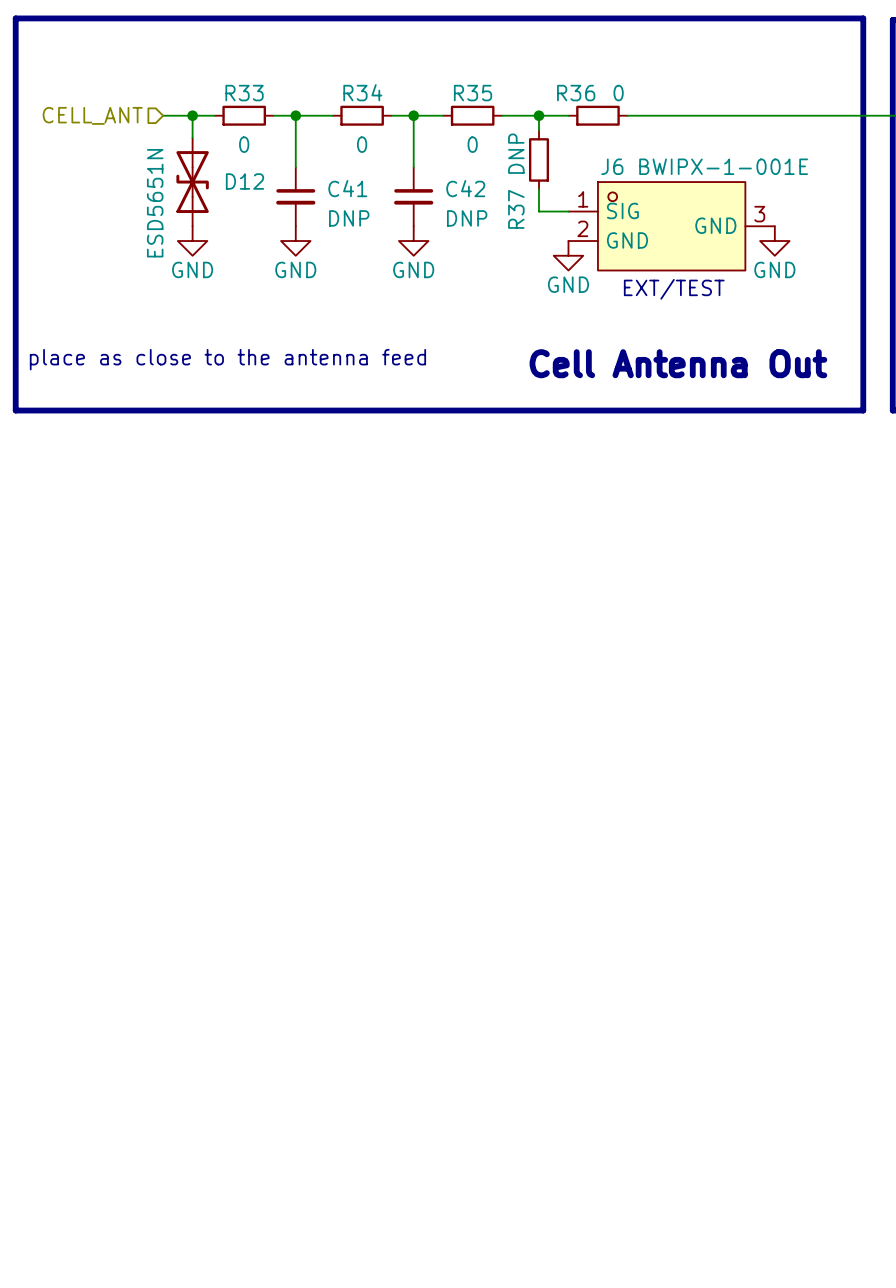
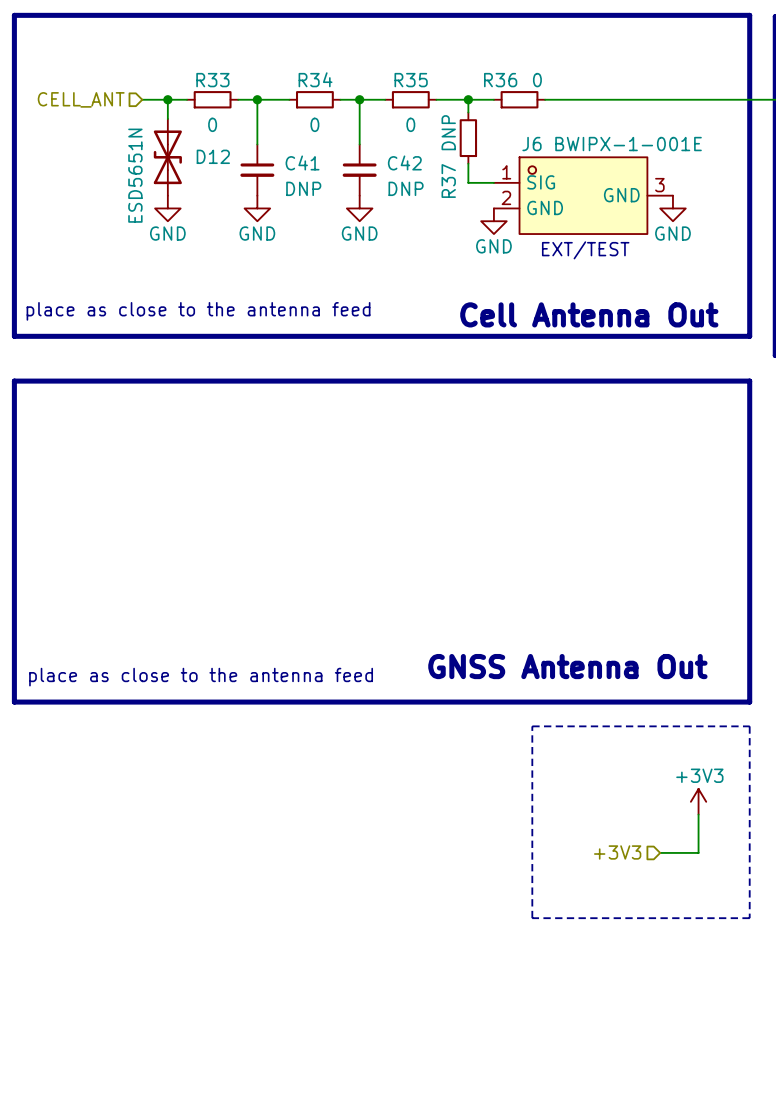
line: (15, 388) (15, 410) (863, 410) (863, 388) -> (14, 336) (749, 336)
line: none -> (14, 381) (14, 702) (749, 702) (749, 381) (14, 381)
text: none -> GNSS Antenna Out (567, 666)
text: none -> place as close to the antenna feed (201, 677)
line: none -> (532, 726) (749, 726) (749, 918) (532, 918) (532, 726)
power symbol: none -> +3V3 (698, 801)
wire: none -> (698, 814) (698, 852) (660, 852)
hierarchical label: none -> +3V3 (617, 852)

